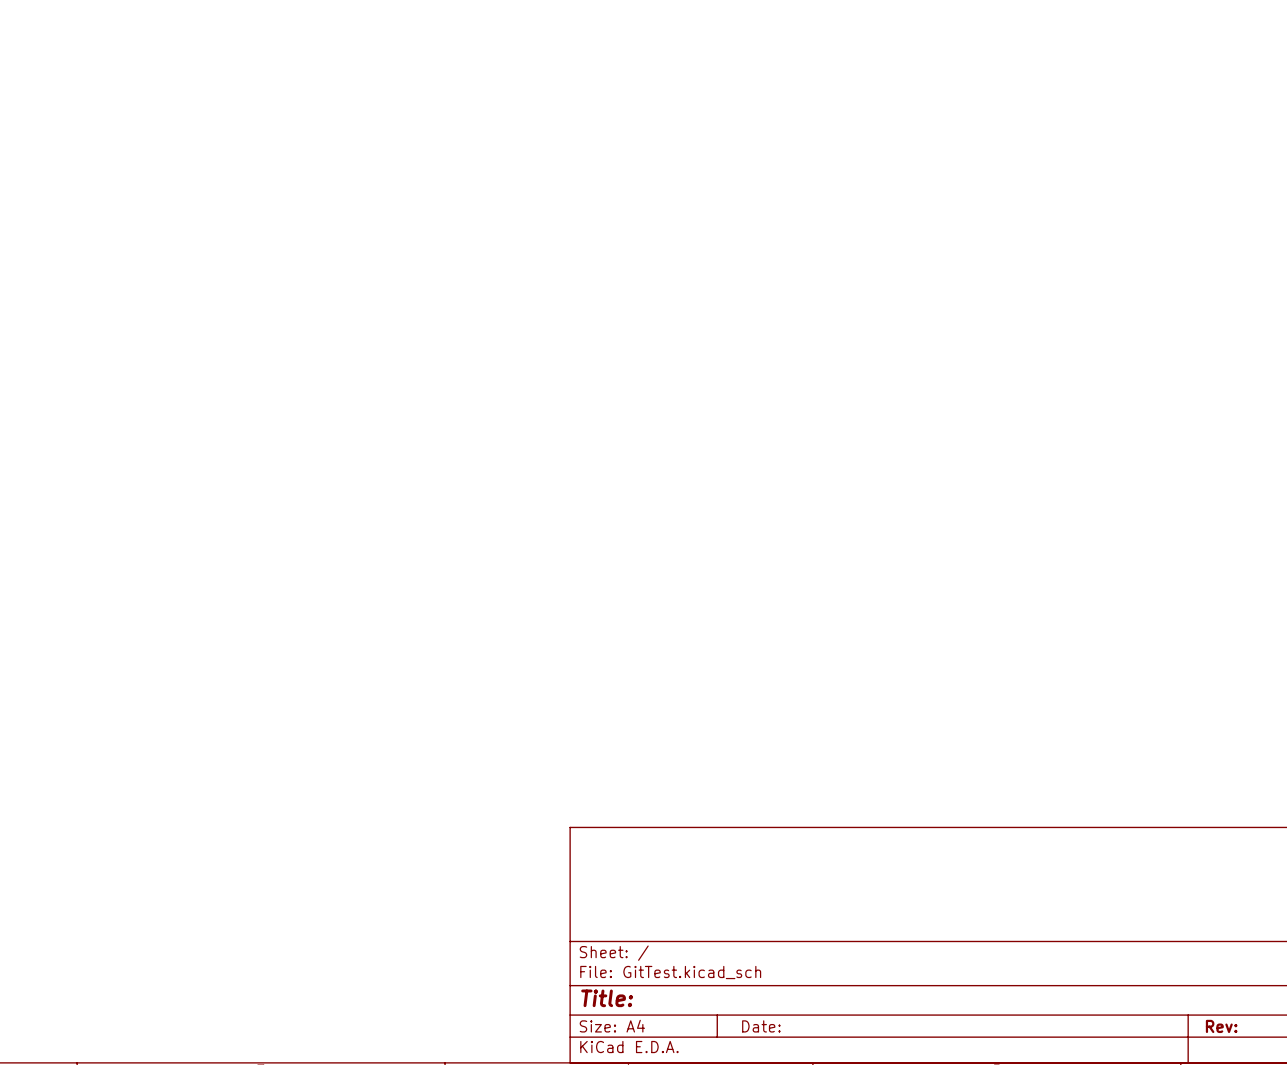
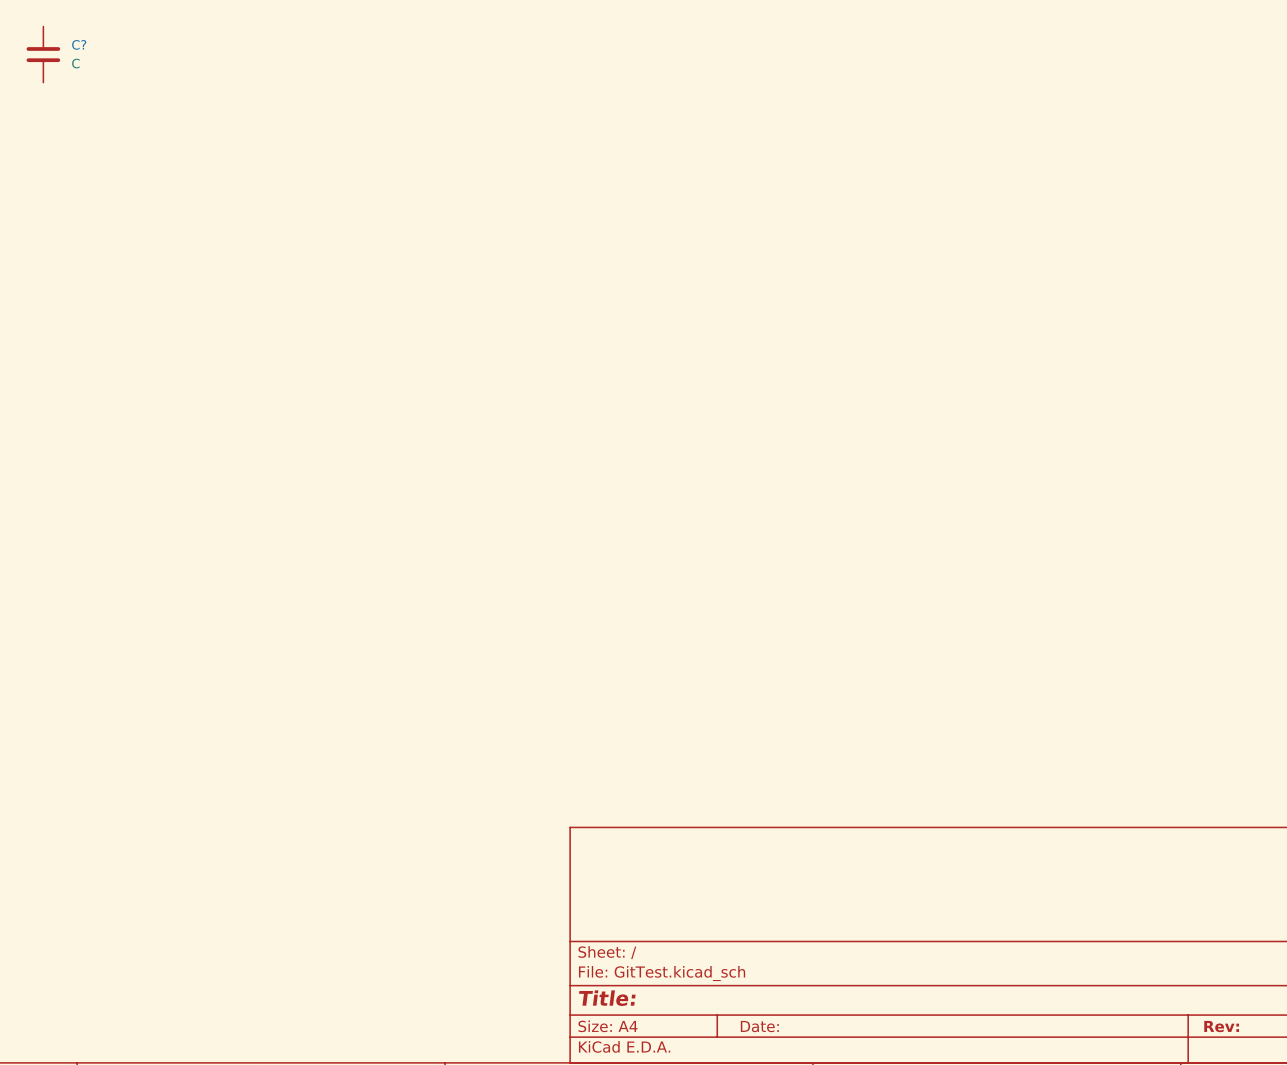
C?: none -> C (43, 54)

